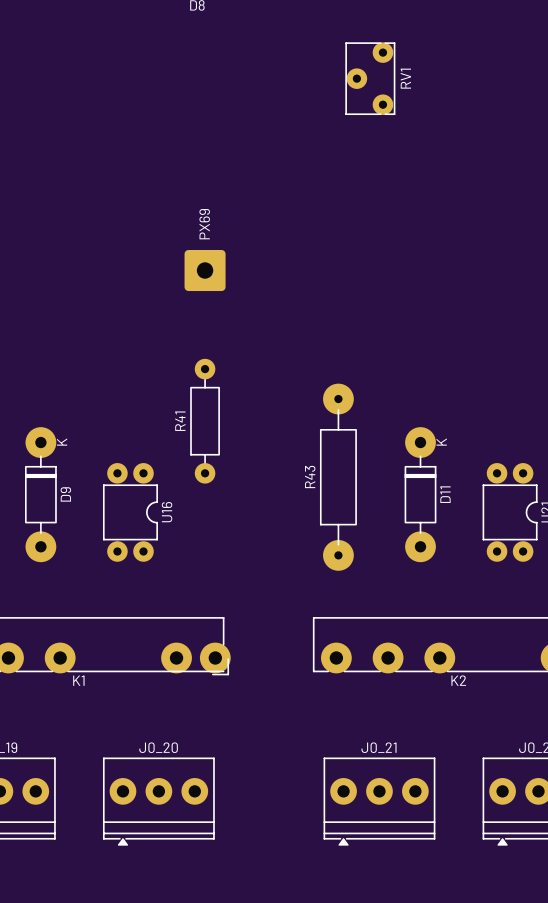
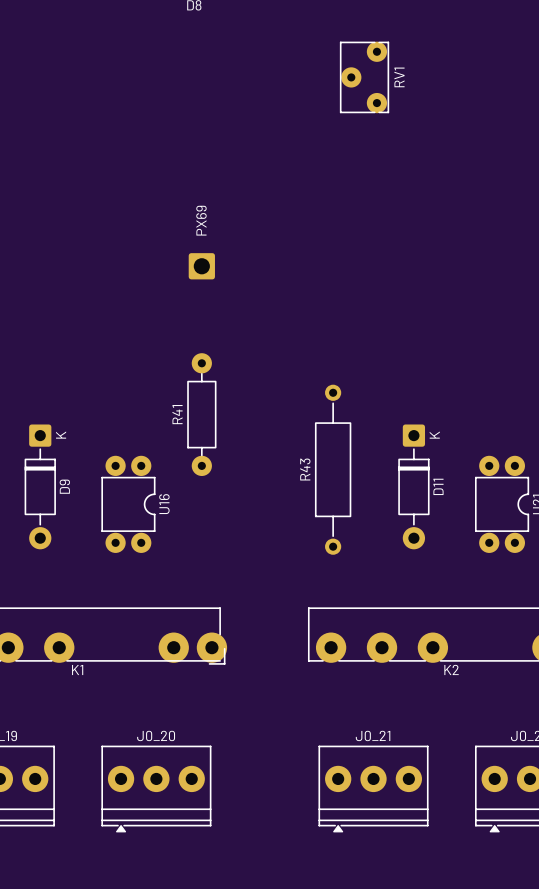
PX69 footprint: [184, 249, 226, 292] -> [188, 253, 215, 280]
R43 footprint: [320, 383, 357, 571] -> [315, 384, 352, 555]
D9 footprint: [25, 427, 57, 563] -> [24, 424, 56, 550]
D11 footprint: [404, 427, 437, 563] -> [398, 424, 430, 550]

